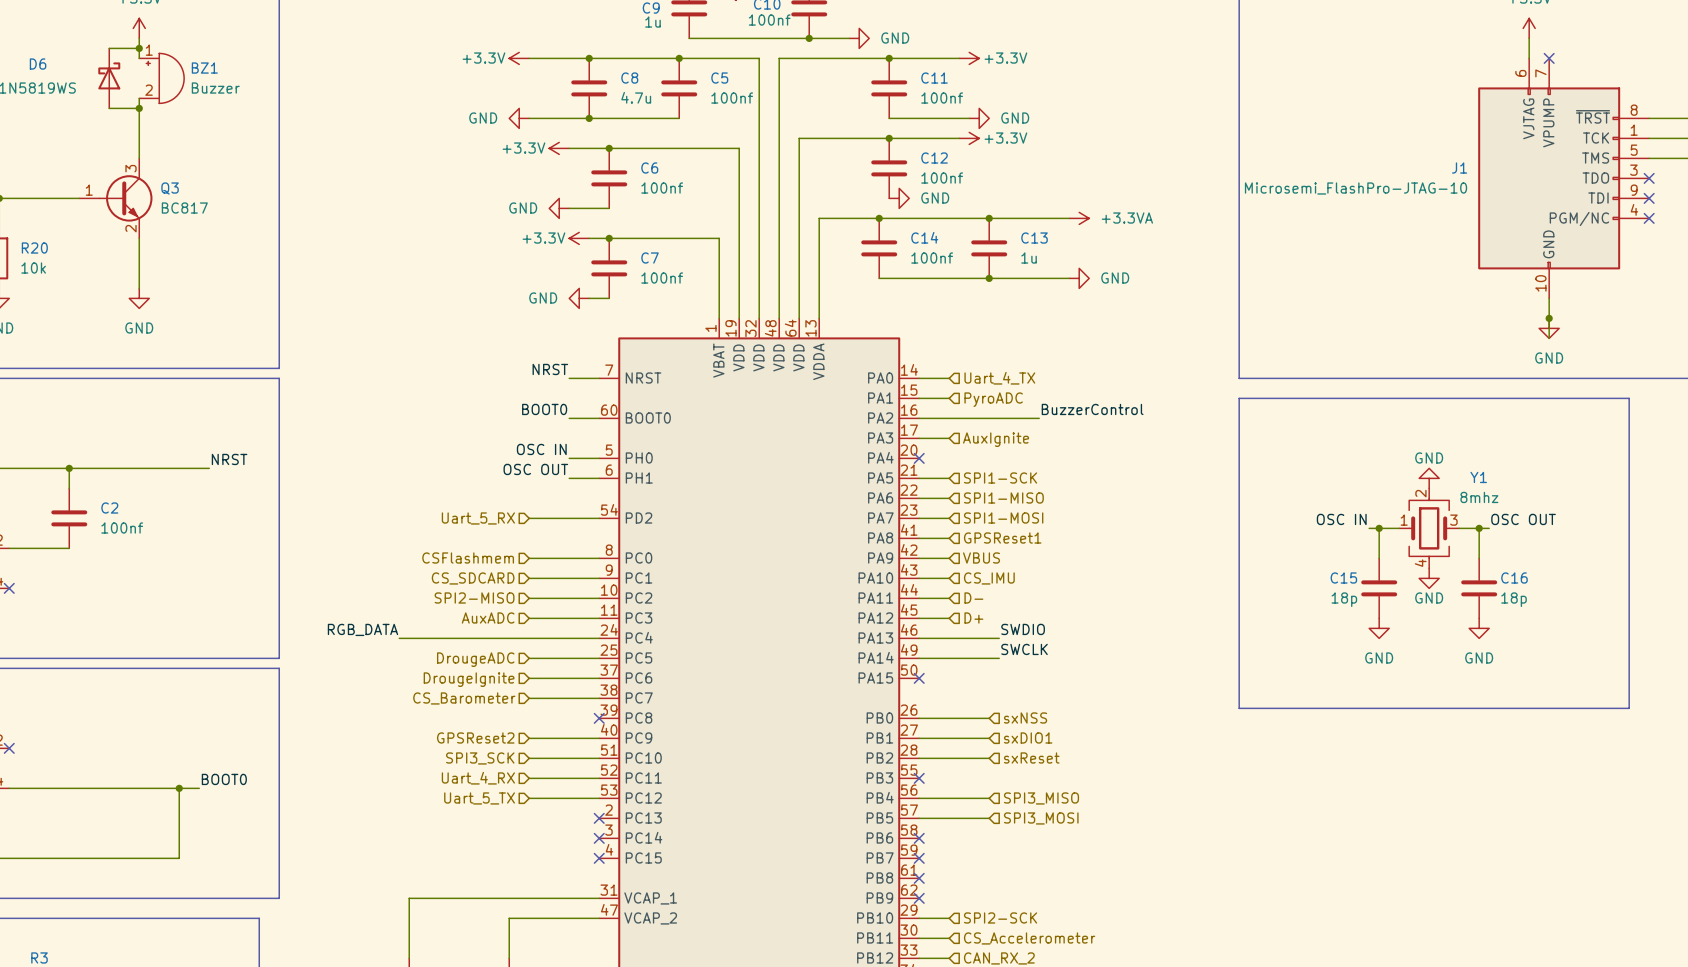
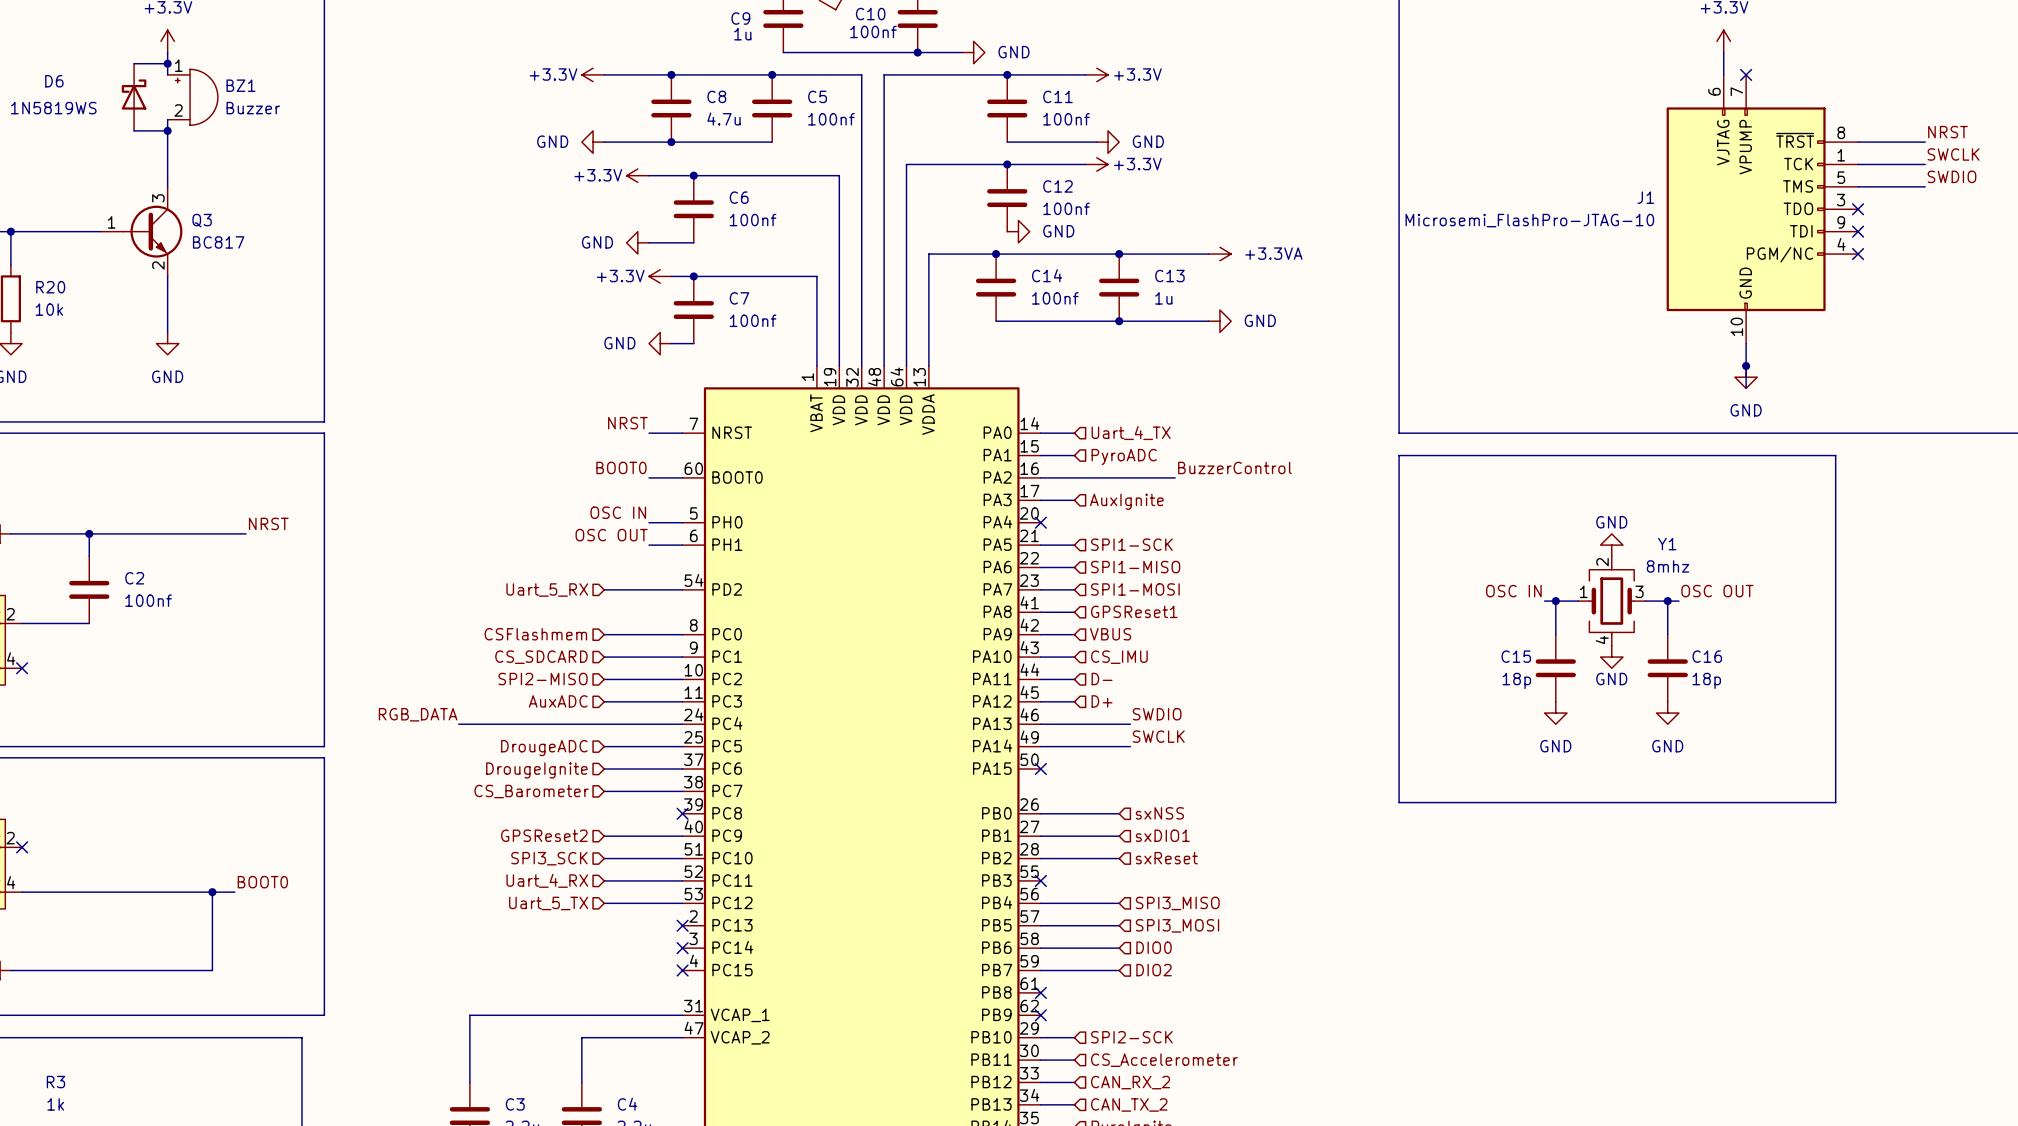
hierarchical label: none -> DIO0 (1154, 947)
wire: none -> (1040, 948) (1119, 948)
no-connect mark: (919, 838) -> none
hierarchical label: none -> DIO2 (1154, 970)
wire: none -> (1040, 970) (1119, 970)
no-connect mark: (919, 858) -> none

